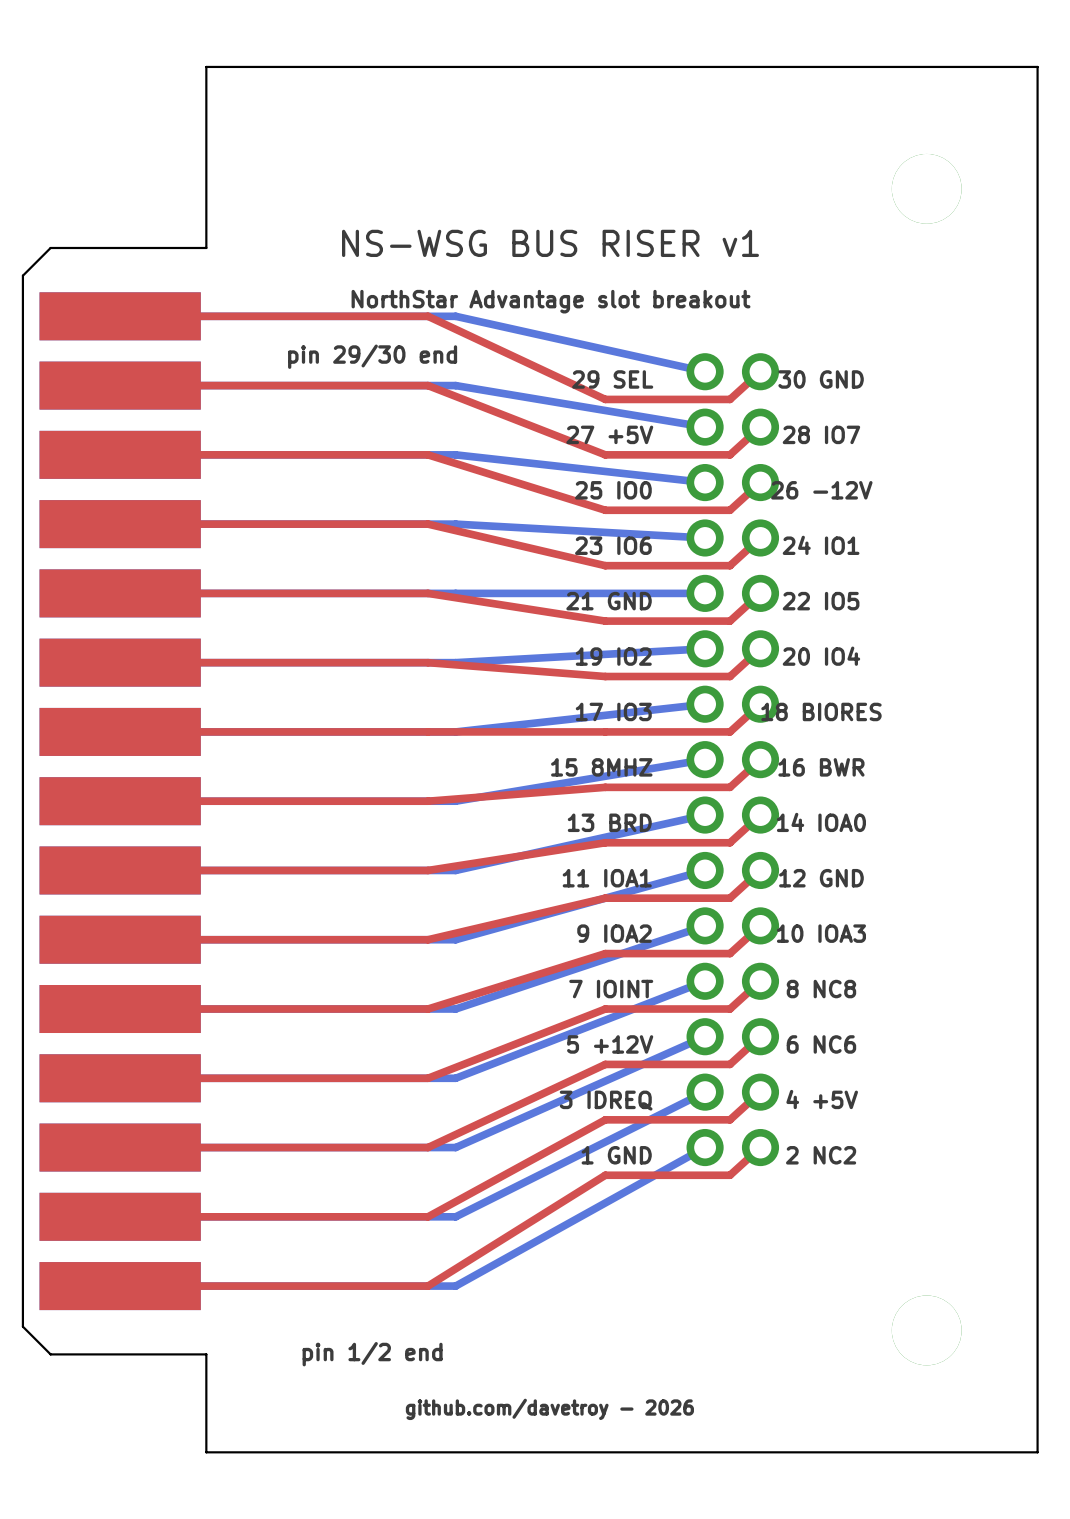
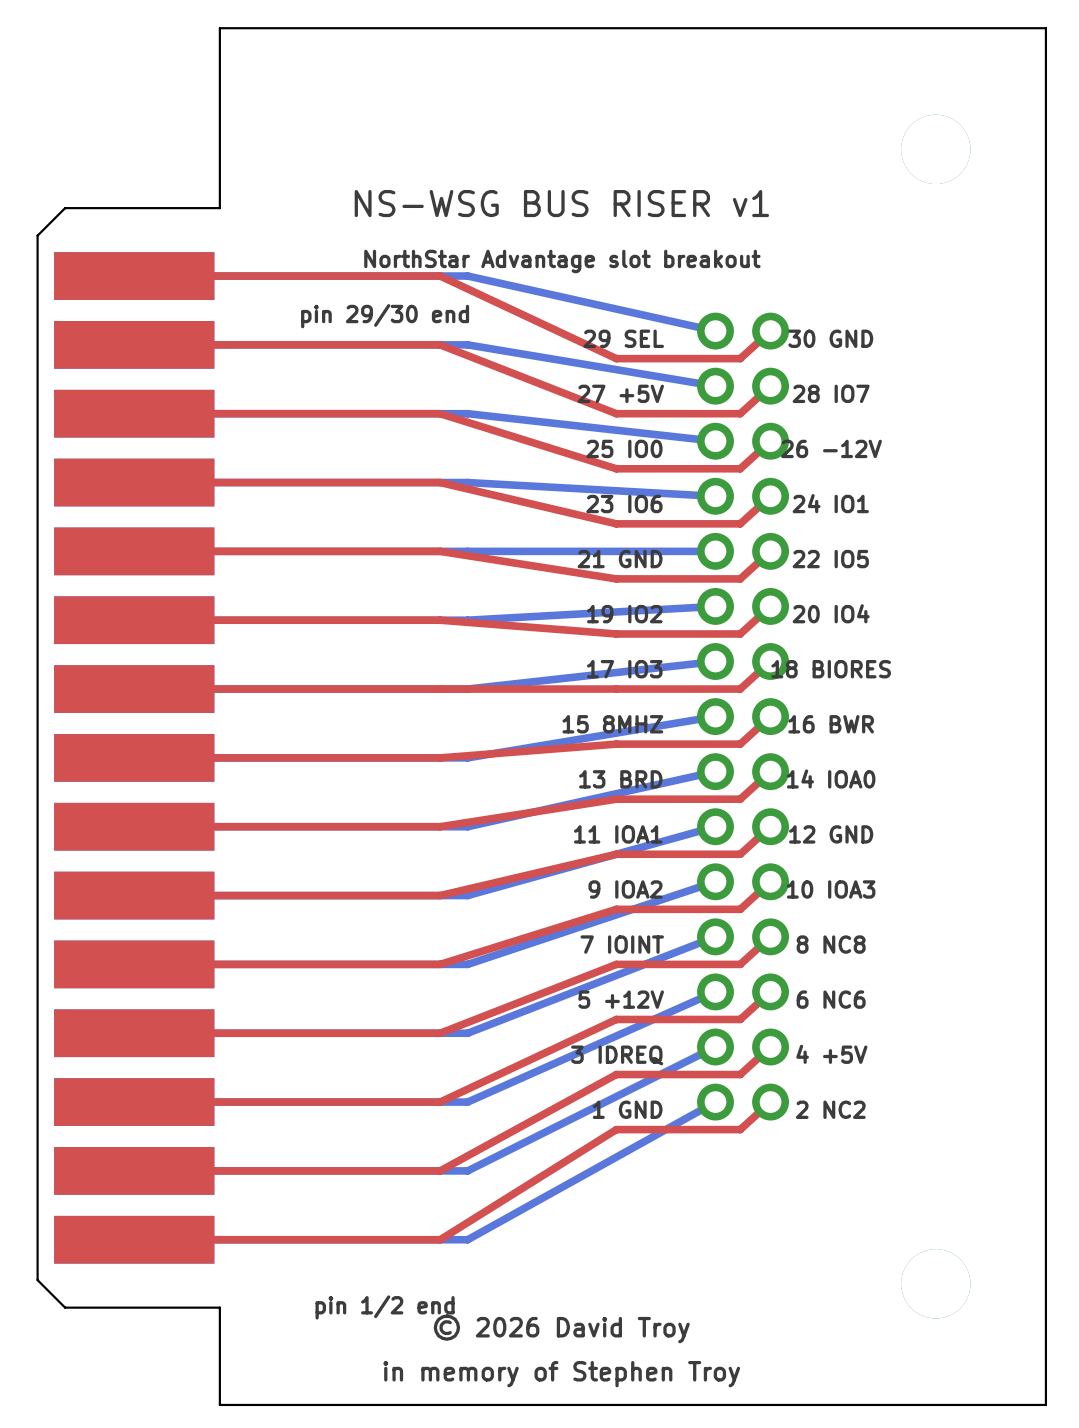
text: none -> © 2026 David Troy (561, 1328)
text: github.com/davetroy - 2026 (549, 1409) -> in memory of Stephen Troy (561, 1374)

